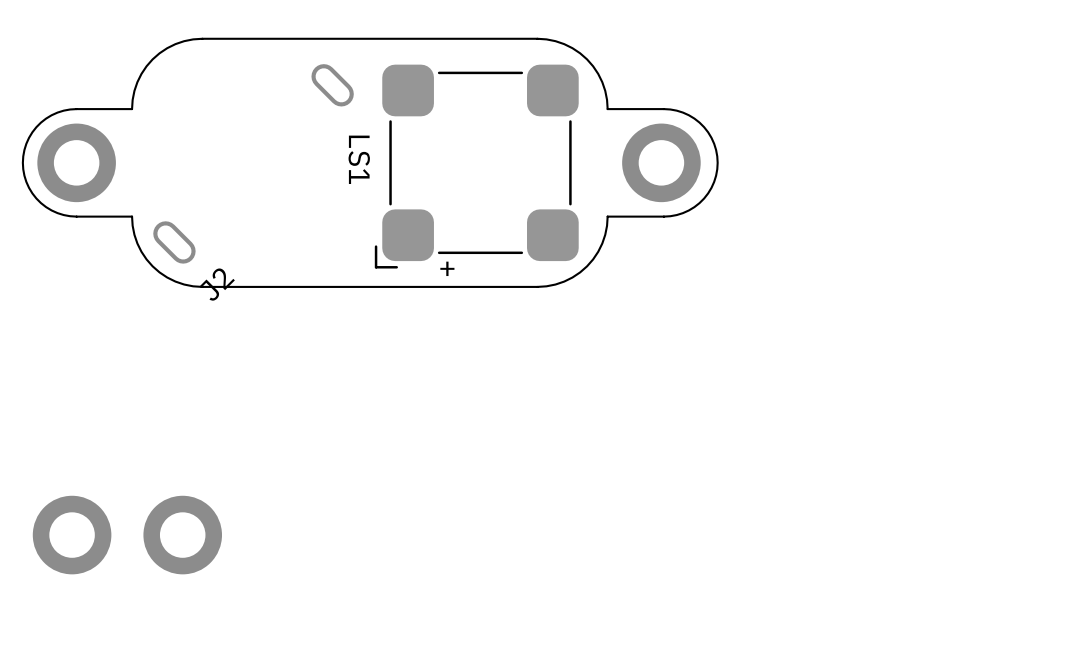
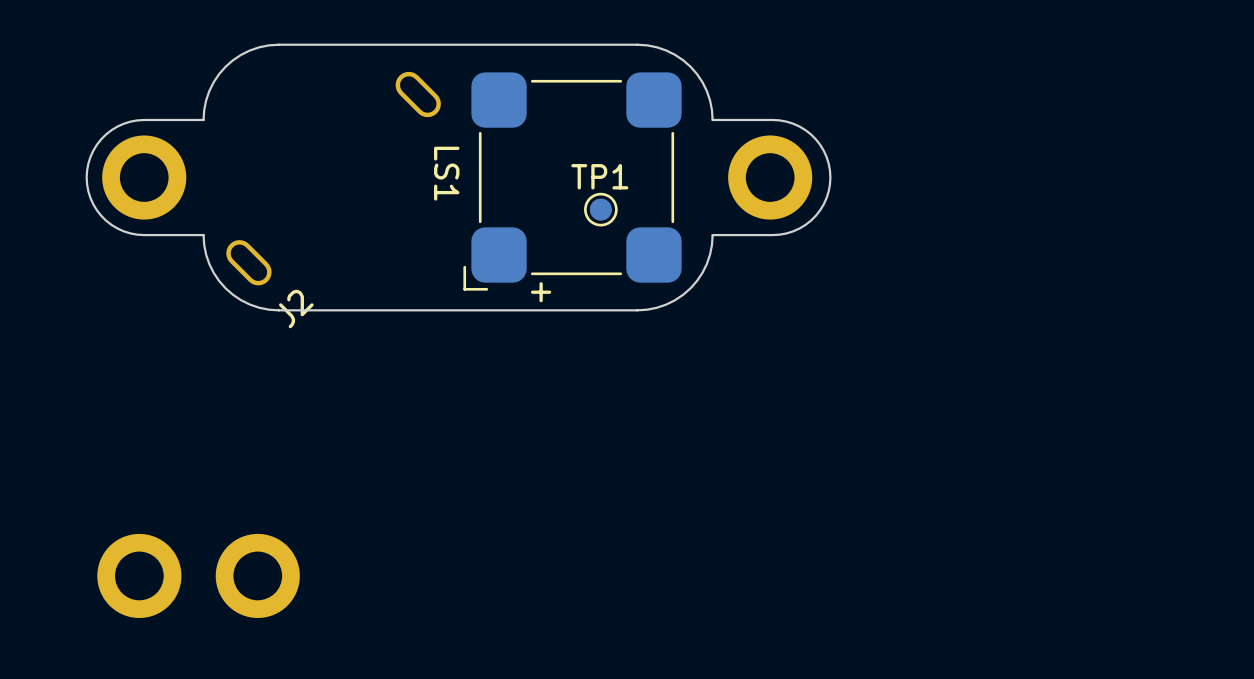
TP1: none -> (600, 209)

